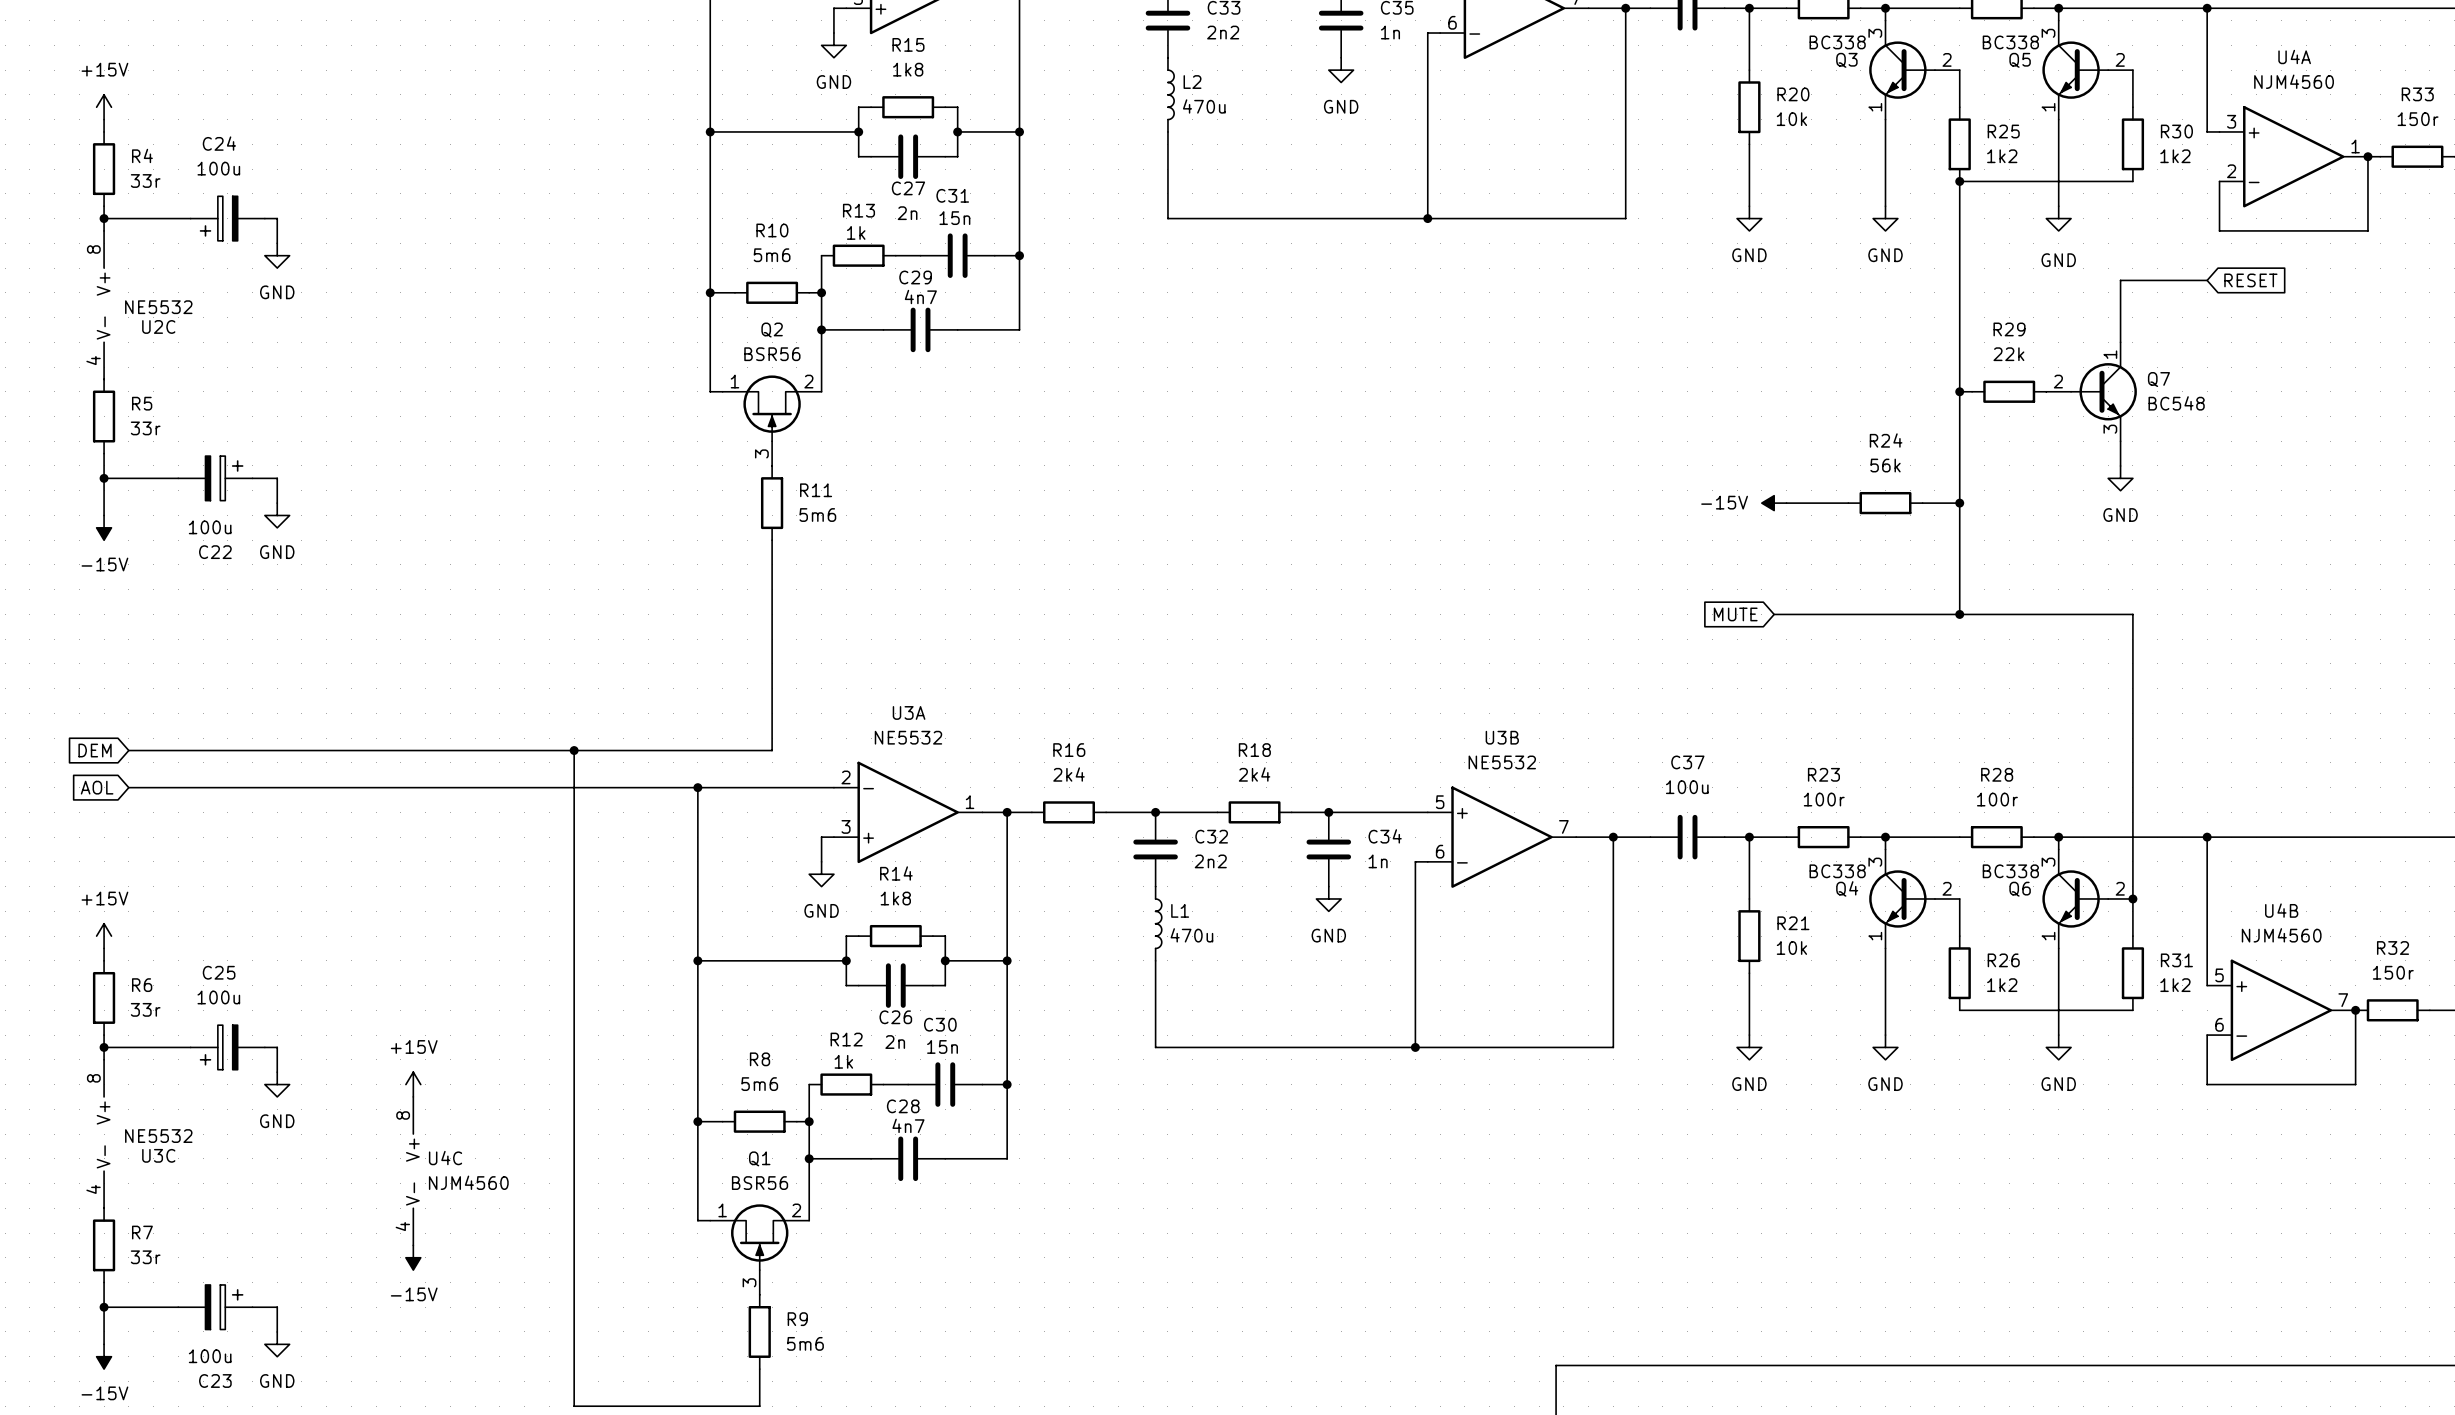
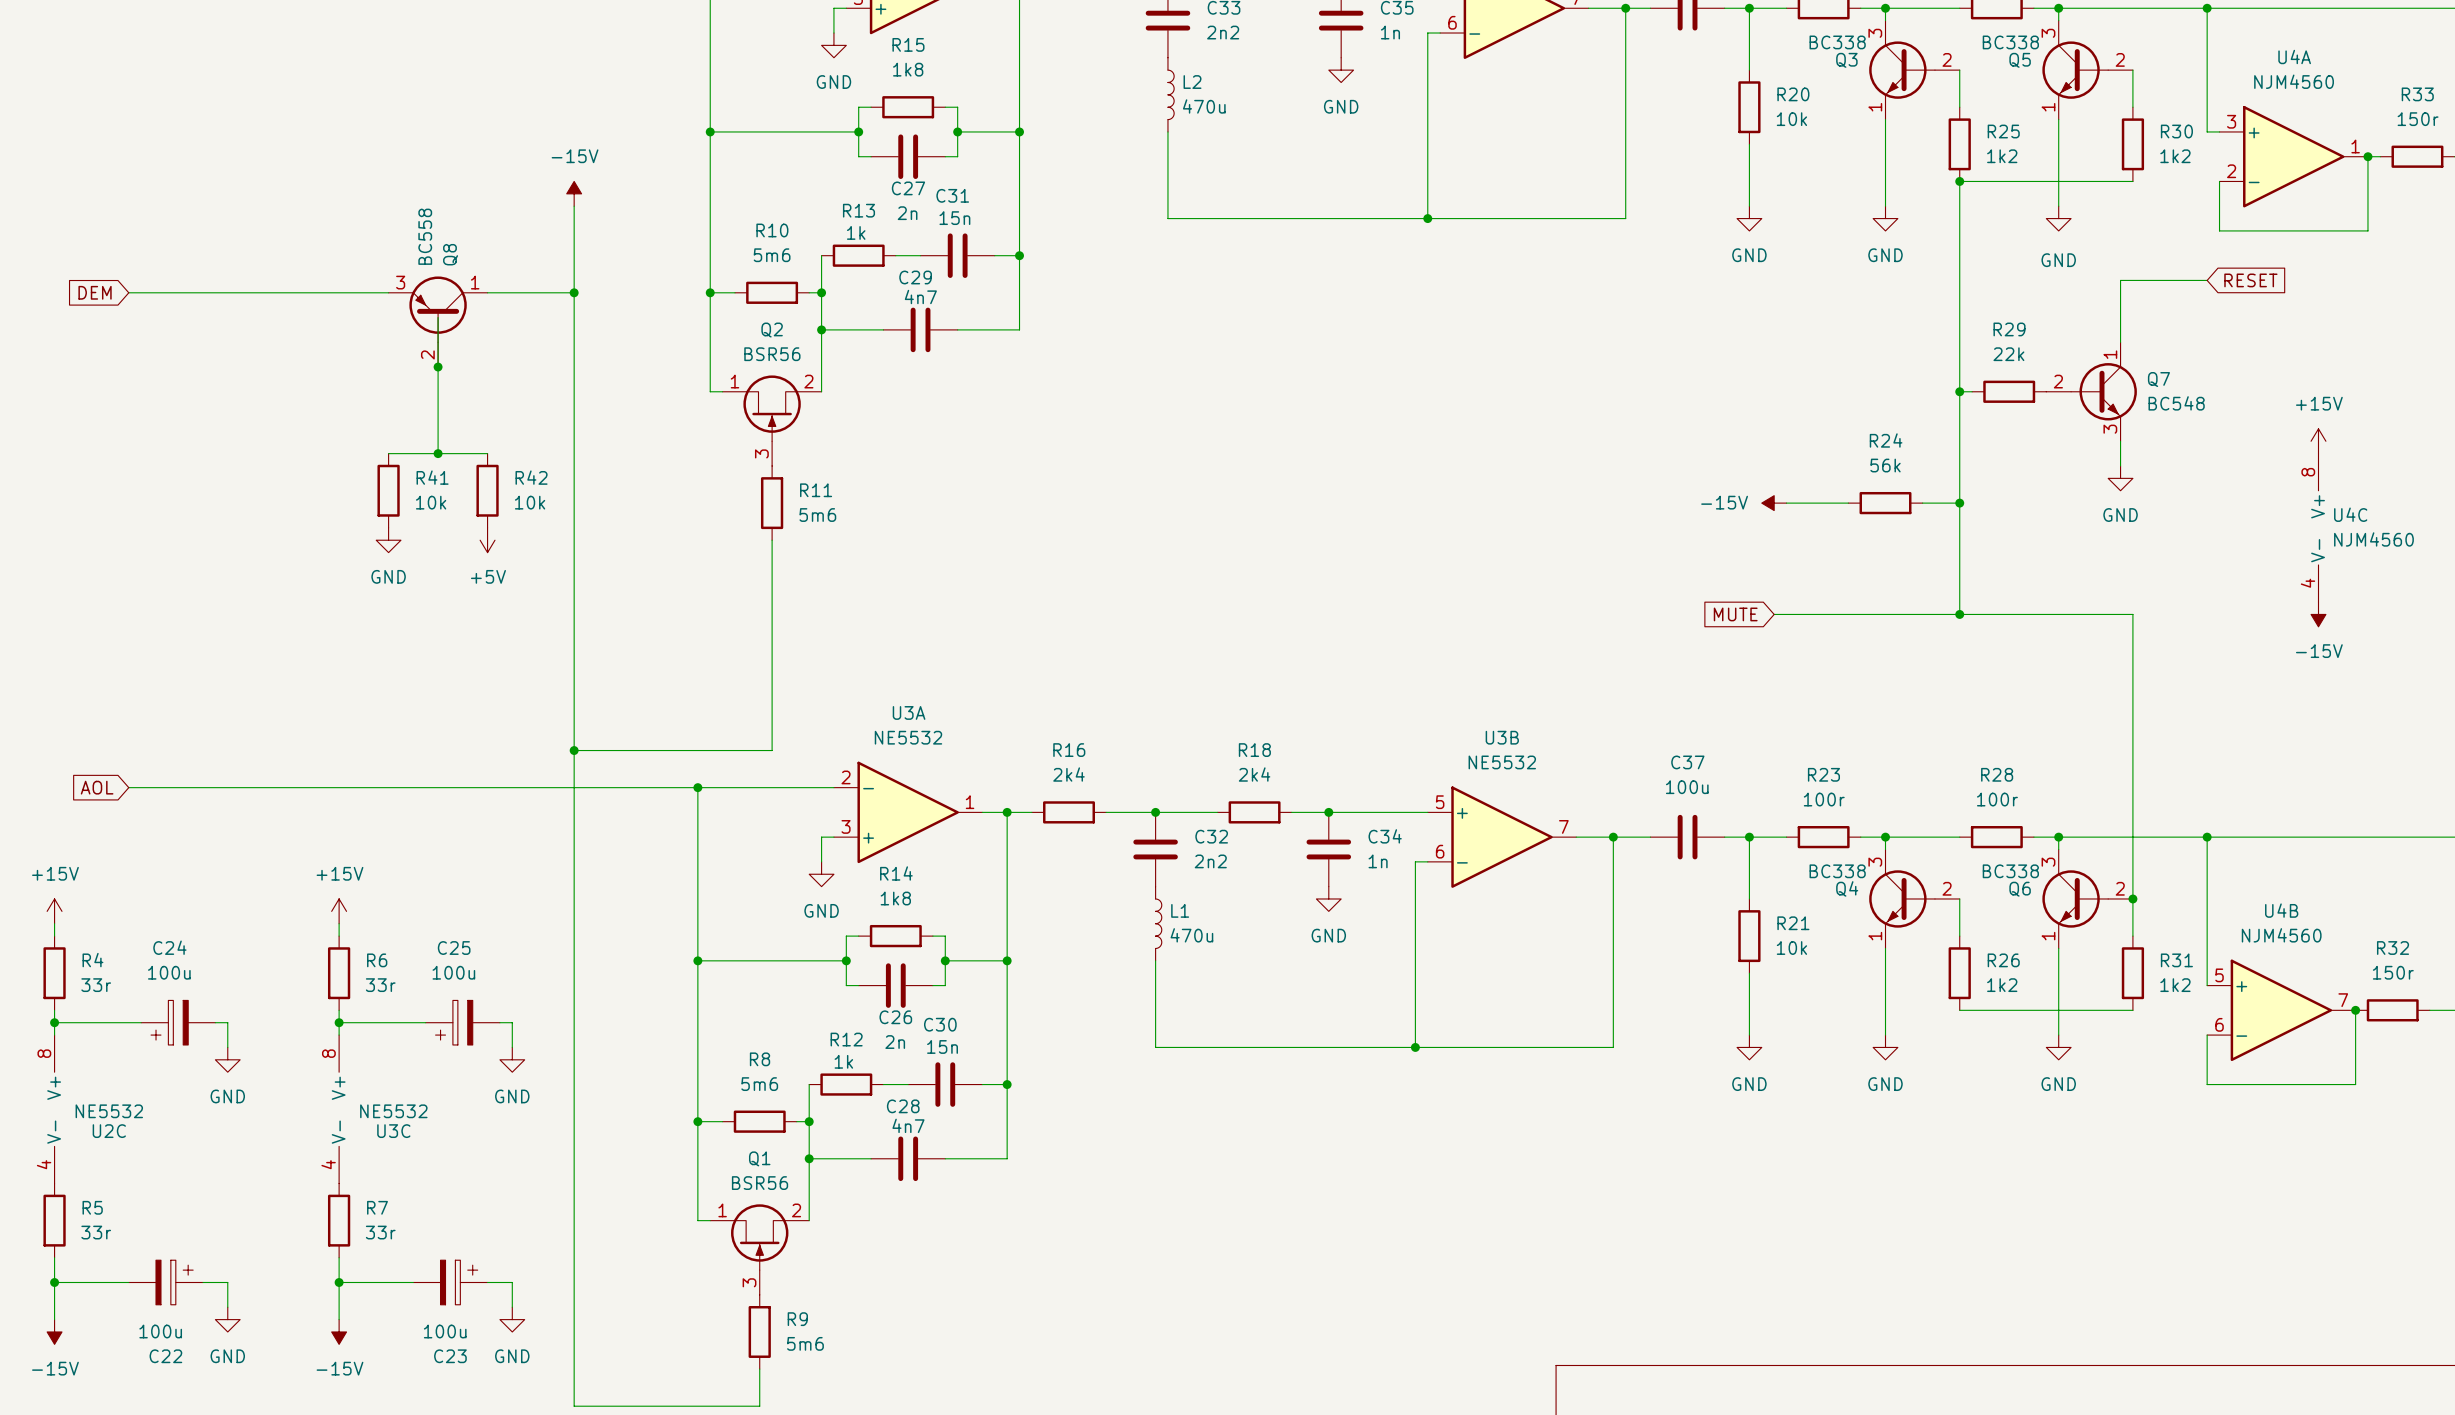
power symbol: +15V (104, 107) -> none
wire: (104, 119) (104, 131) -> none
R4 position: (104, 169) -> (54, 973)
power symbol: none -> -15V (574, 193)
wire: (104, 206) (104, 230) -> none
wire: (104, 218) (190, 218) -> none
junction: (104, 218) -> none
C24 position: (227, 218) -> (178, 1022)
wire: (264, 218) (277, 218) (277, 243) -> none
power symbol: GND (277, 255) -> none
global label: none -> DEM (95, 292)
wire: none -> (128, 292) (388, 292)
wire: none -> (487, 292) (574, 292)
junction: none -> (574, 292)
U2C position: (104, 305) -> (54, 1109)
wire: none -> (438, 317) (438, 453)
Q8: none -> BC558 (438, 321)
junction: none -> (438, 367)
R5 position: (104, 416) -> (54, 1220)
power symbol: none -> +15V (2318, 441)
wire: (104, 453) (104, 515) -> none
wire: none -> (388, 453) (487, 453)
junction: none -> (438, 453)
wire: (104, 478) (178, 478) -> none
junction: (104, 478) -> none
C22 position: (215, 478) -> (165, 1282)
wire: (252, 478) (277, 478) (277, 503) -> none
R41: none -> 10k (388, 490)
R42: none -> 10k (487, 490)
power symbol position: GND (277, 515) -> GND (388, 540)
power symbol: -15V (104, 527) -> none
power symbol: none -> +5V (487, 540)
power symbol: none -> -15V (2318, 614)
global label: DEM (95, 750) -> none
wire: (128, 750) (574, 750) -> (574, 206) (574, 750)
power symbol: none -> +15V (339, 911)
wire: none -> (339, 923) (339, 936)
power symbol position: +15V (104, 936) -> +15V (54, 911)
wire: (104, 948) (104, 960) -> (54, 923) (54, 936)
R6 position: (104, 997) -> (339, 973)
wire: none -> (339, 1010) (339, 1035)
wire: none -> (339, 1022) (425, 1022)
junction: none -> (339, 1022)
wire: none -> (499, 1022) (512, 1022) (512, 1047)
wire: (104, 1035) (104, 1059) -> (54, 1010) (54, 1035)
wire: (104, 1047) (190, 1047) -> (54, 1022) (141, 1022)
junction position: (104, 1047) -> (54, 1022)
C25 position: (227, 1047) -> (462, 1022)
wire: (264, 1047) (277, 1047) (277, 1072) -> (215, 1022) (227, 1022) (227, 1047)
power symbol: none -> GND (512, 1059)
power symbol position: GND (277, 1084) -> GND (227, 1059)
power symbol: +15V (413, 1084) -> none
U3C position: (104, 1134) -> (339, 1109)
U4C position: (413, 1171) -> (2318, 527)
R7 position: (104, 1245) -> (339, 1220)
wire: none -> (339, 1257) (339, 1319)
power symbol position: -15V (413, 1257) -> -15V (339, 1331)
wire: (104, 1282) (104, 1344) -> (54, 1257) (54, 1319)
wire: none -> (339, 1282) (413, 1282)
junction: none -> (339, 1282)
wire: none -> (487, 1282) (512, 1282) (512, 1307)
wire: (104, 1307) (178, 1307) -> (54, 1282) (128, 1282)
junction position: (104, 1307) -> (54, 1282)
C23 position: (215, 1307) -> (450, 1282)
wire: (252, 1307) (277, 1307) (277, 1331) -> (203, 1282) (227, 1282) (227, 1307)
power symbol: none -> GND (512, 1319)
power symbol position: GND (277, 1344) -> GND (227, 1319)
power symbol position: -15V (104, 1356) -> -15V (54, 1331)

